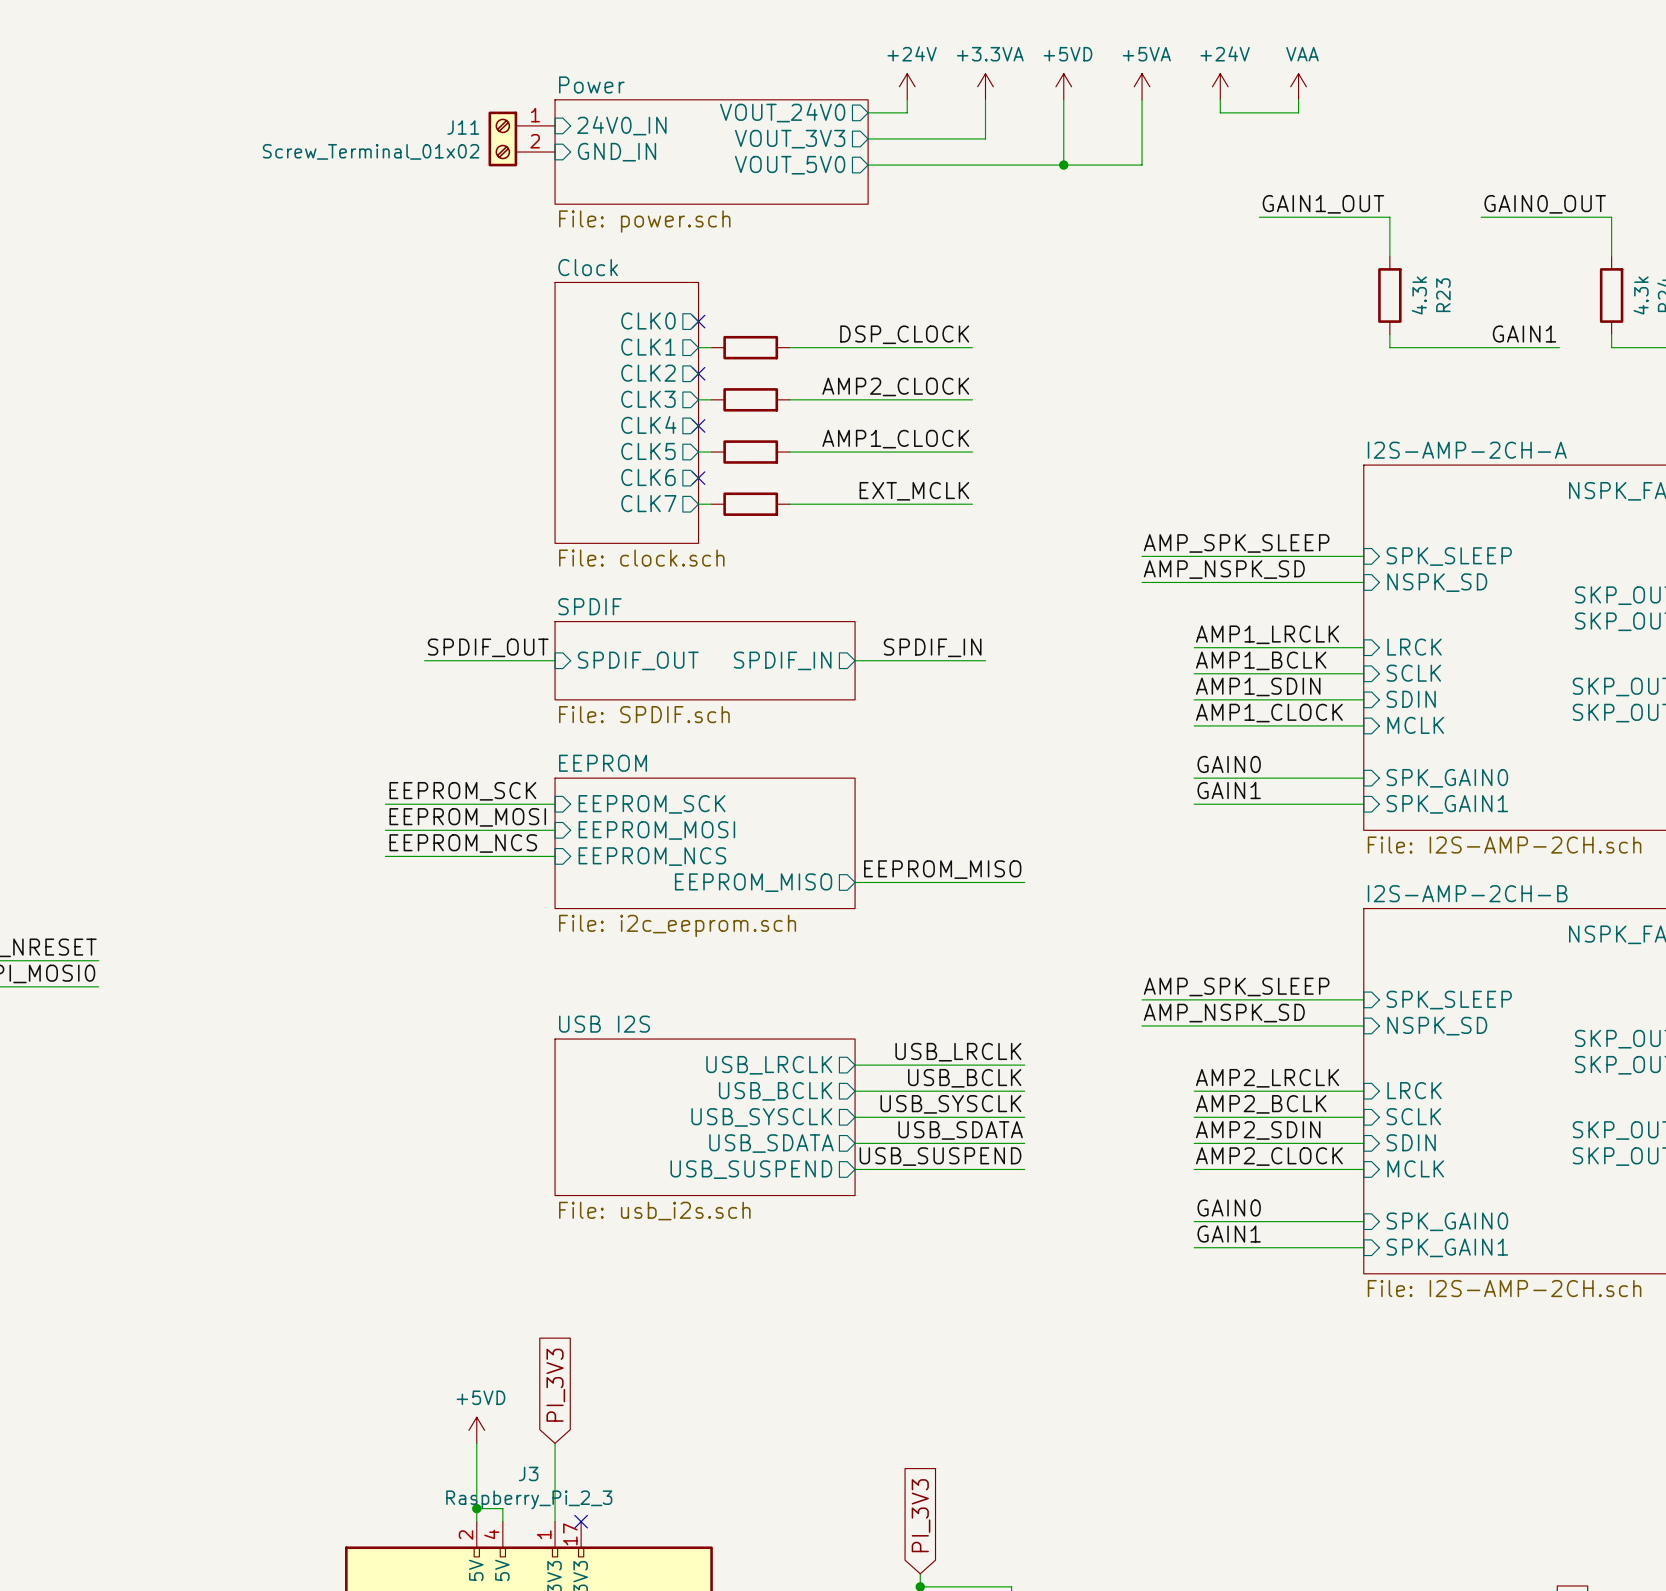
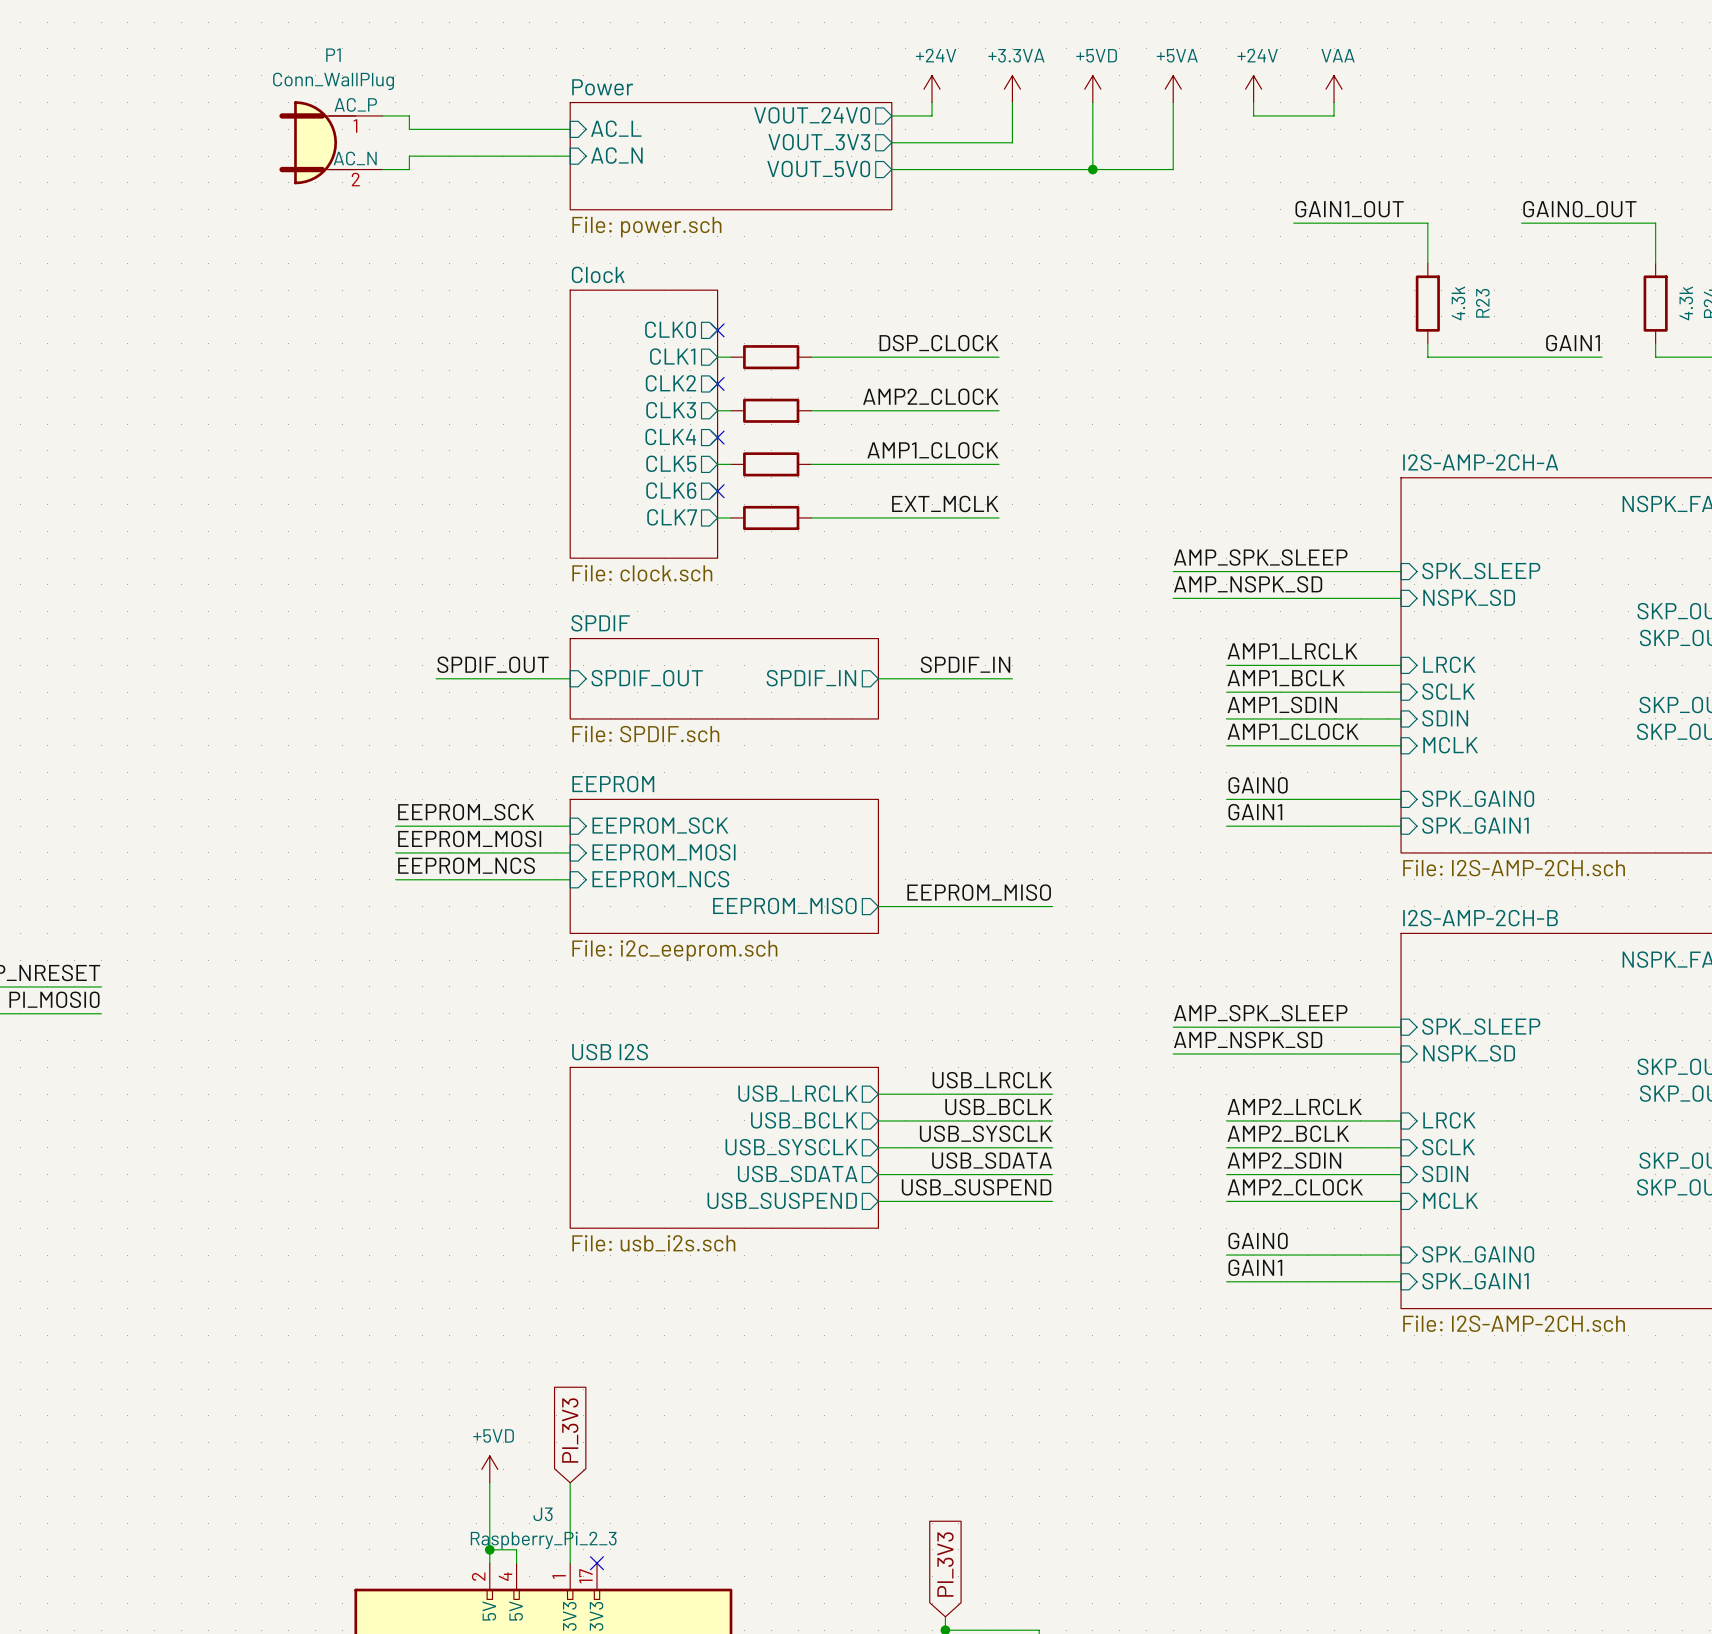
wire: none -> (382, 115) (409, 115) (409, 129) (570, 129)
sheet pin: 24V0_IN (621, 125) -> AC_L (616, 128)
P1: none -> Conn_WallPlug (331, 142)
J11: Screw_Terminal_01x02 (521, 138) -> none
wire: none -> (570, 156) (409, 156) (409, 169) (382, 169)
sheet pin: GND_IN (617, 152) -> AC_N (616, 155)

